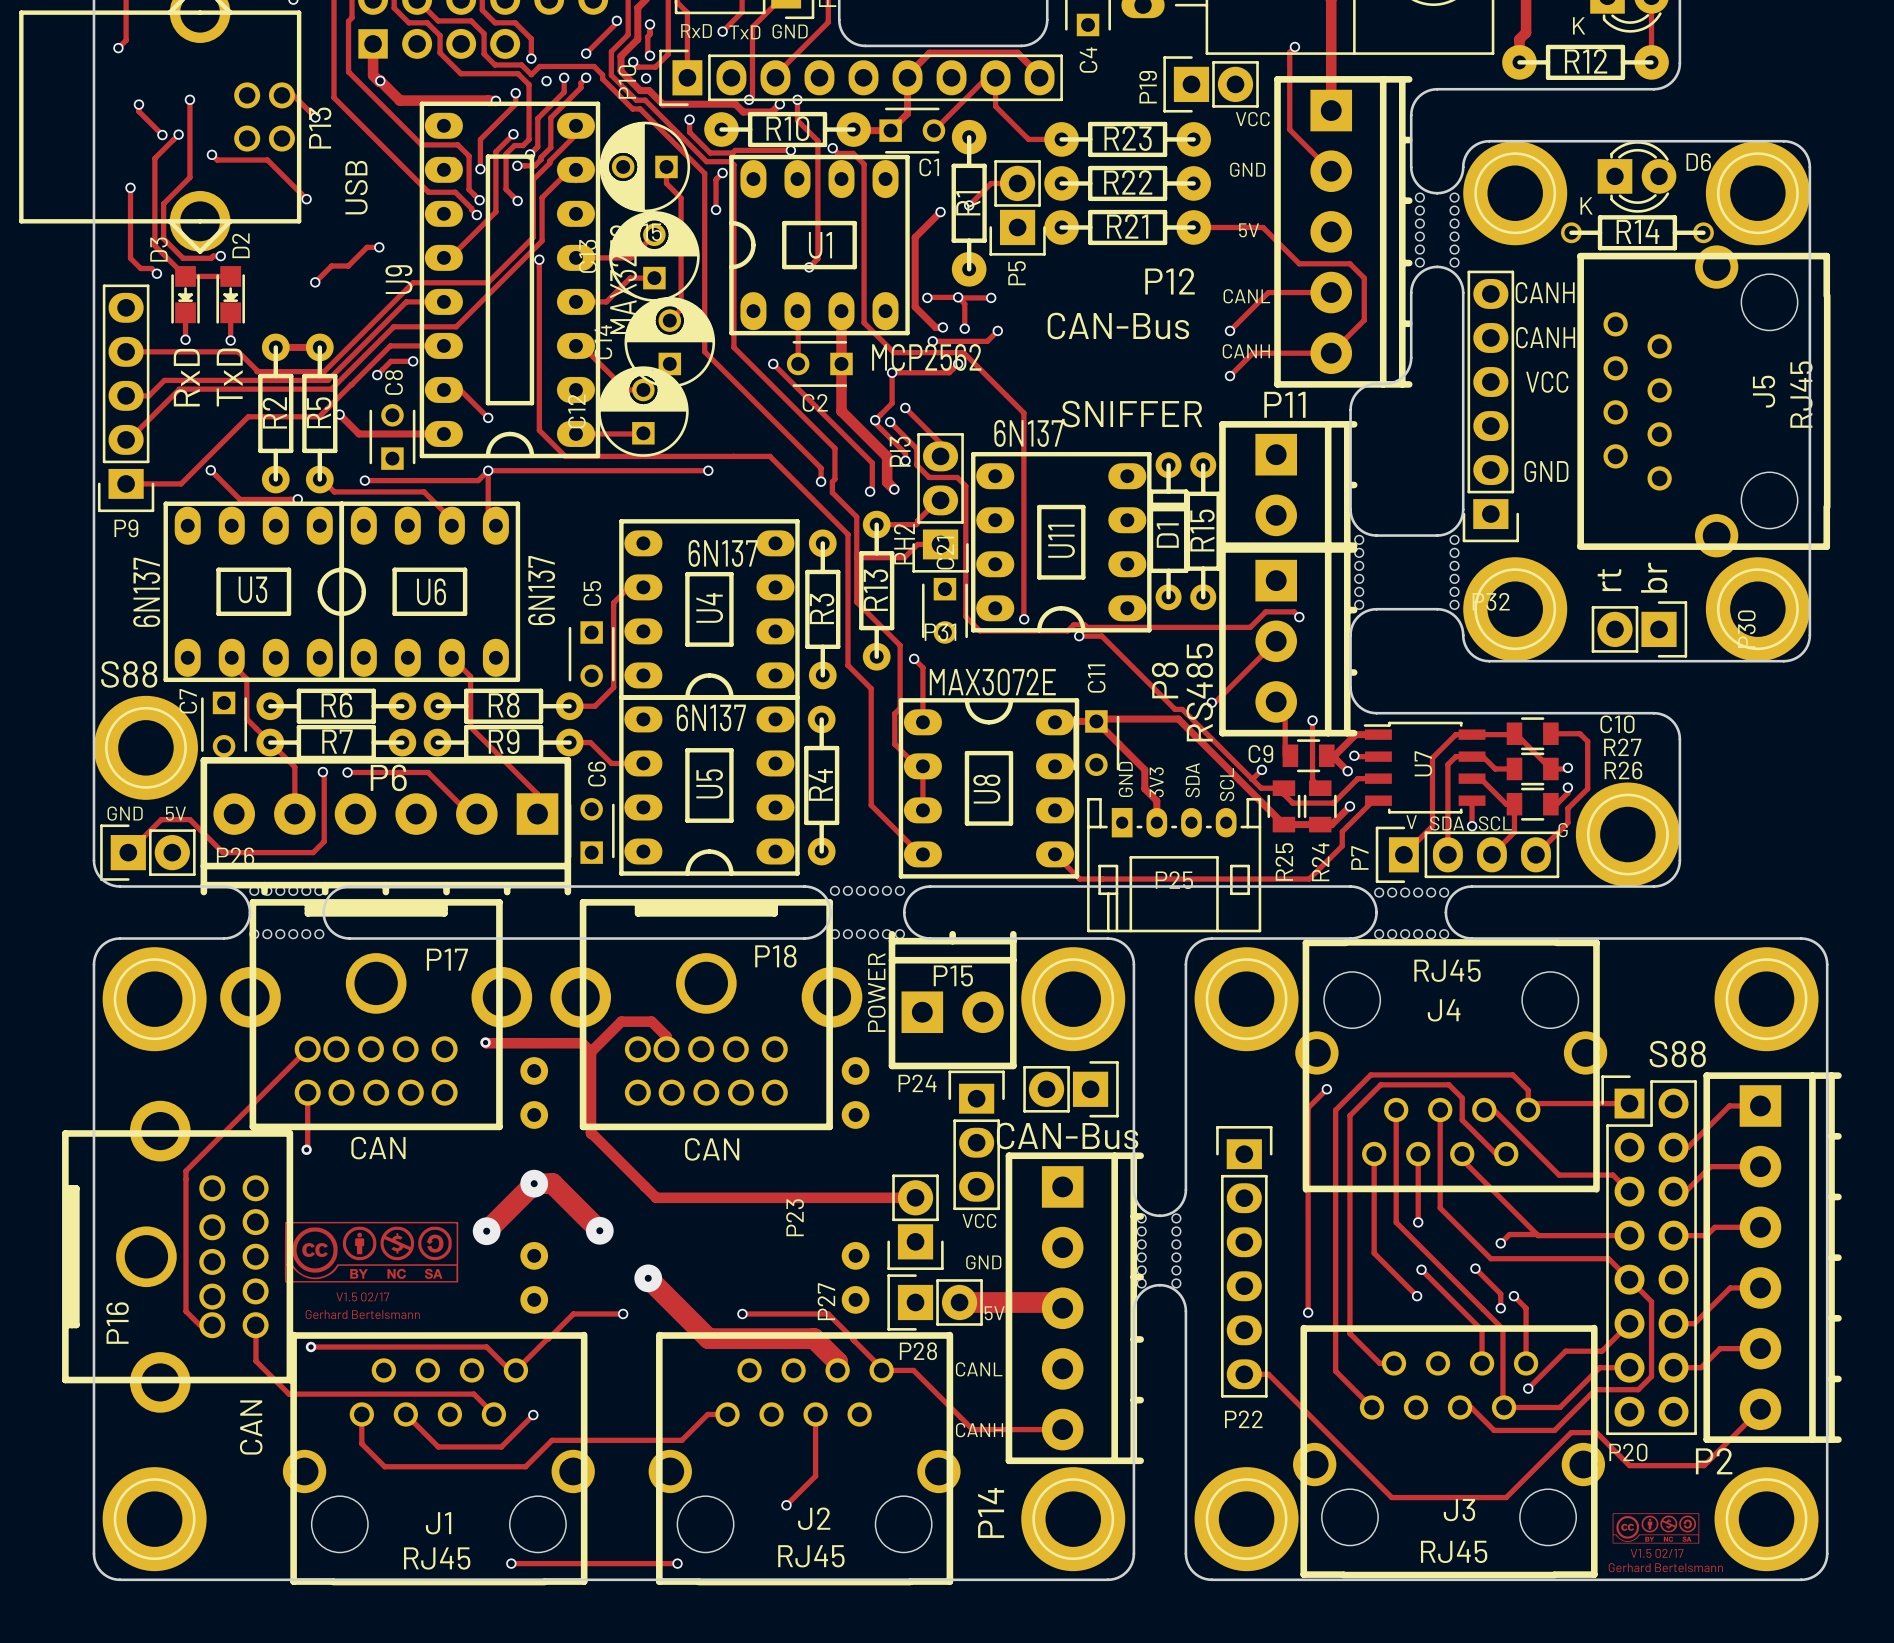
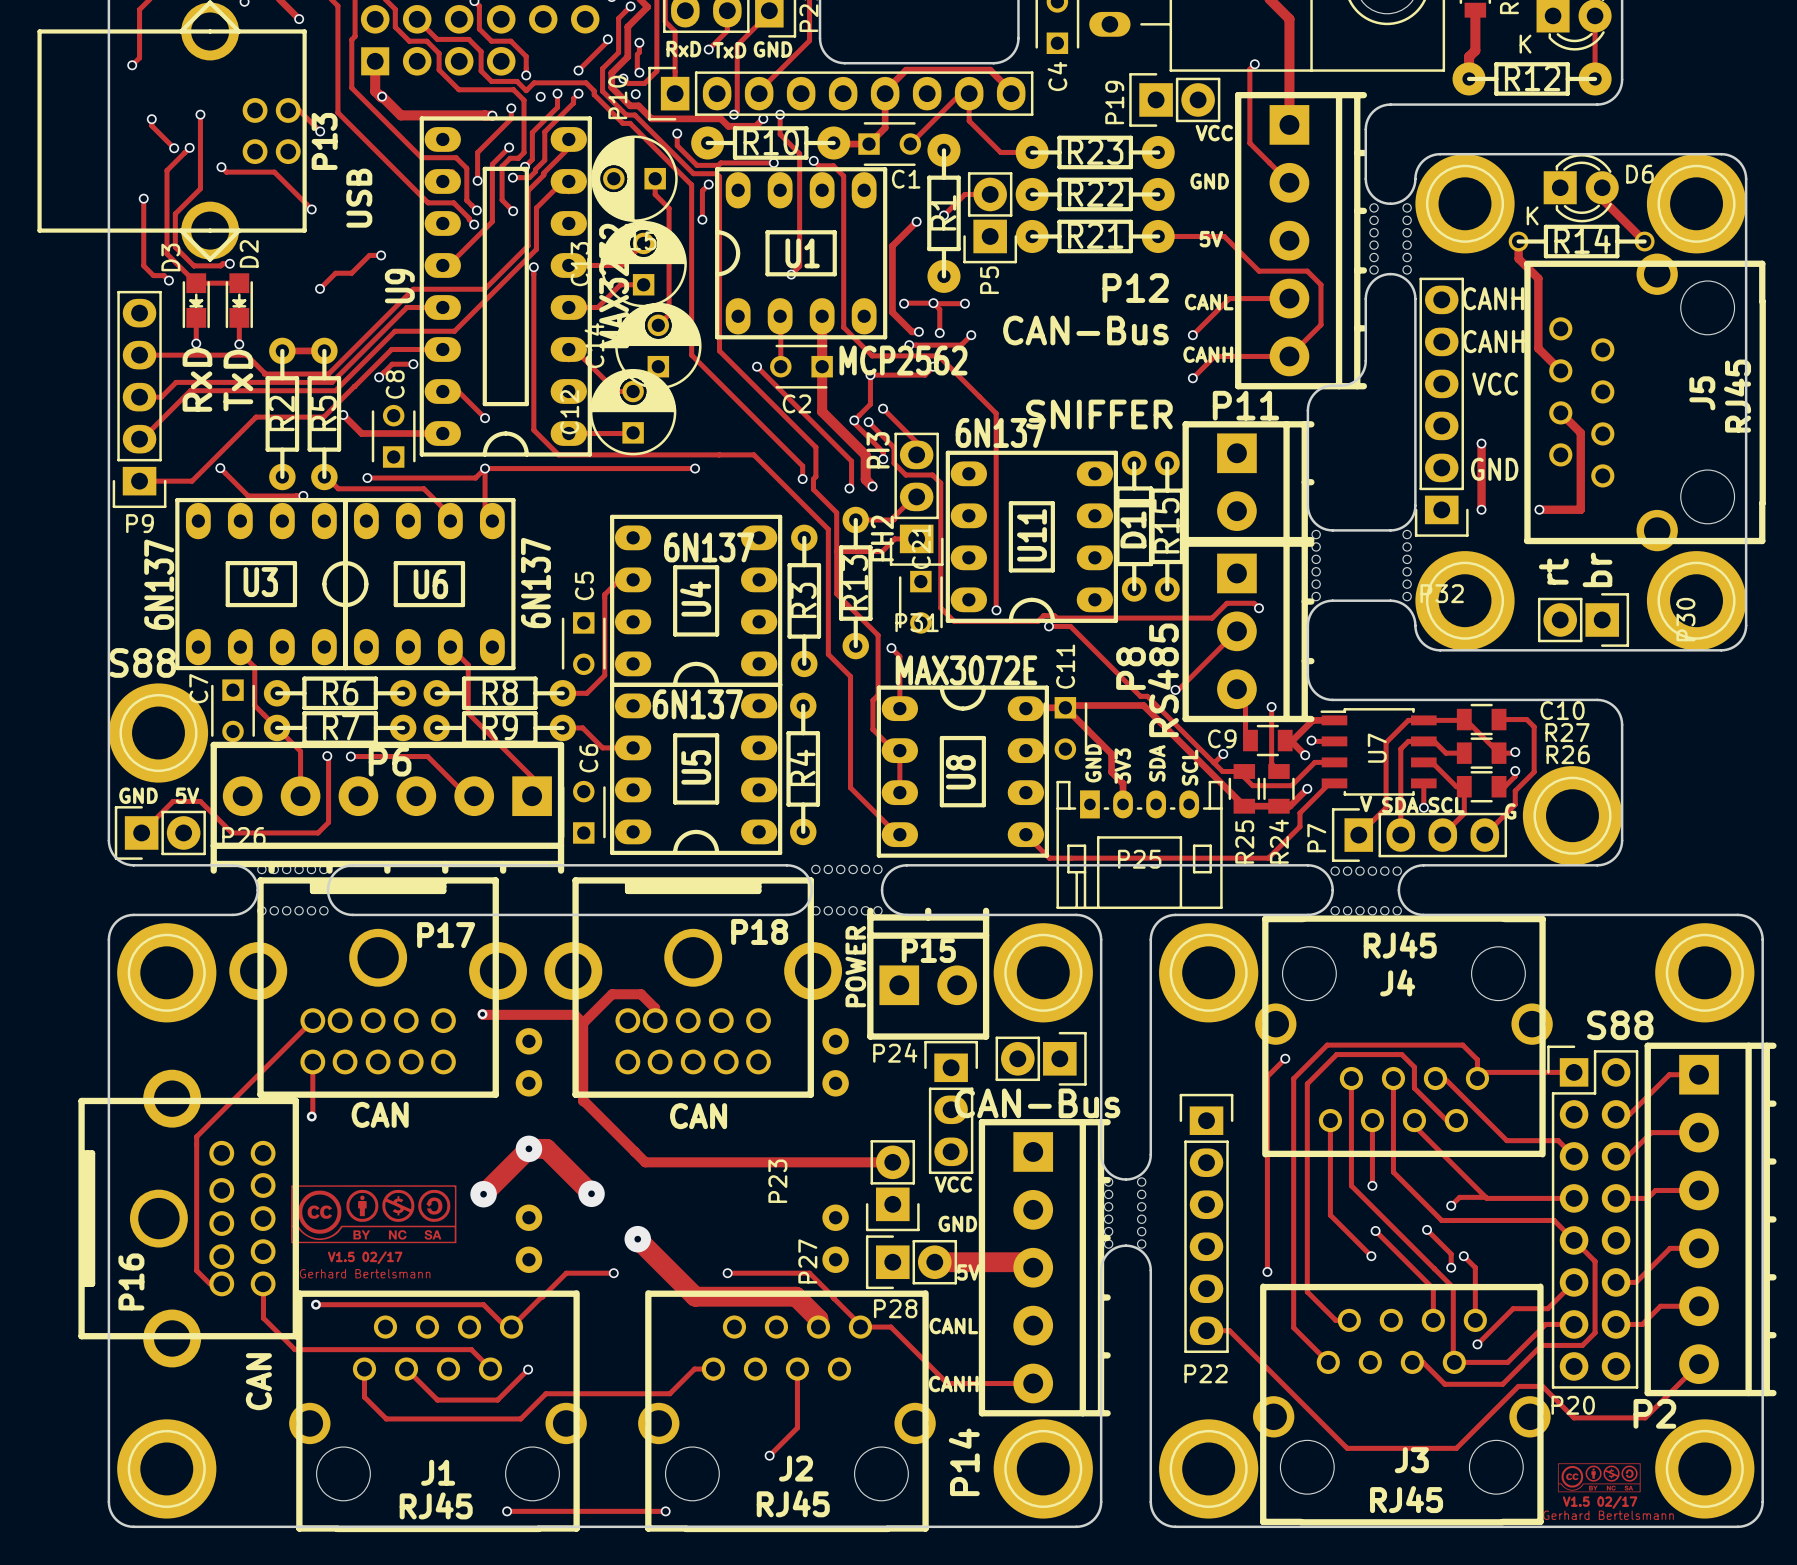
track: none -> (1602, 187) (1602, 199) (1644, 241)
track: none -> (1518, 241) (1518, 258) (1538, 278) (1538, 348) (1560, 370)
track: none -> (1560, 412) (1580, 432) (1580, 509) (1539, 509)
track: none -> (1481, 443) (1481, 509)
via: none -> (1481, 443)
via: none -> (1481, 509)
via: none -> (1539, 509)

